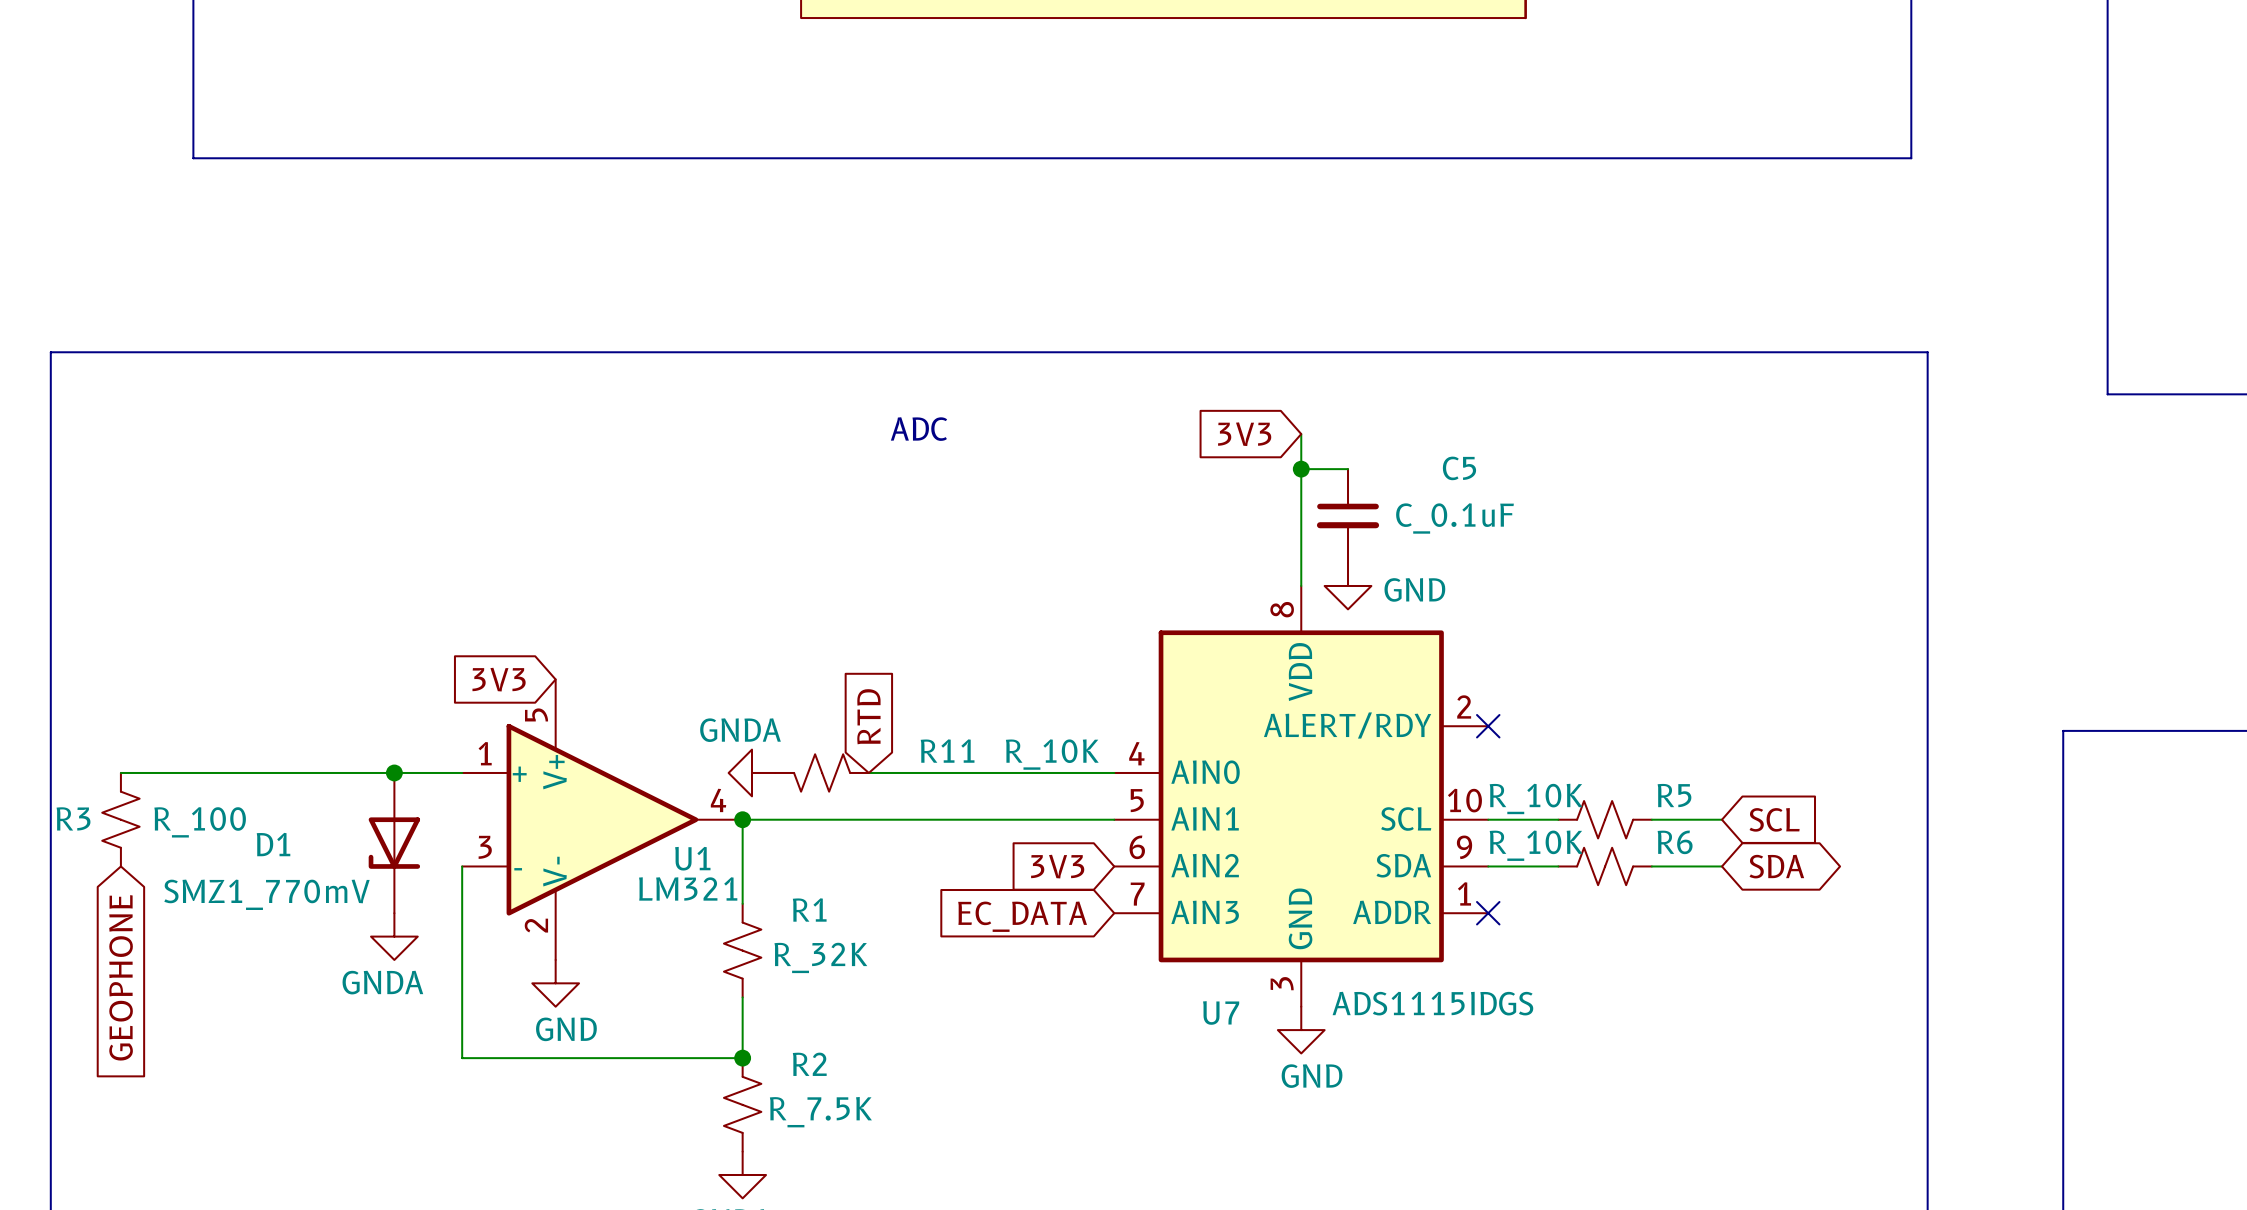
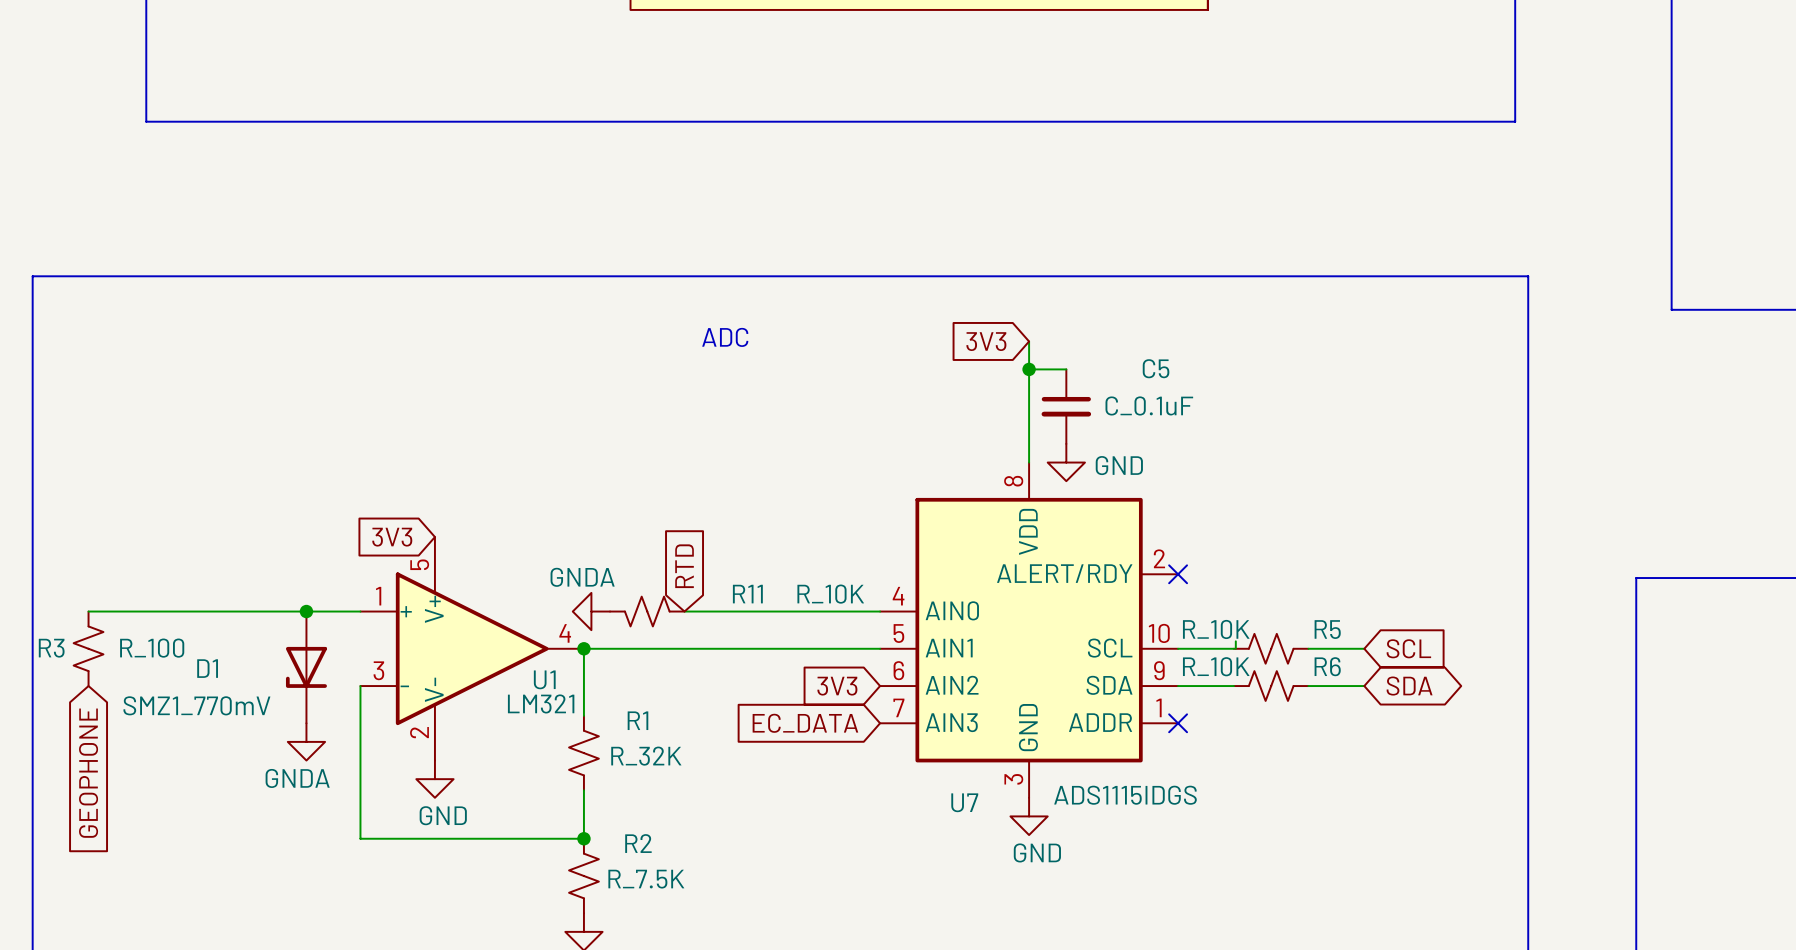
wire: none -> (1235, 641) (1235, 648)

